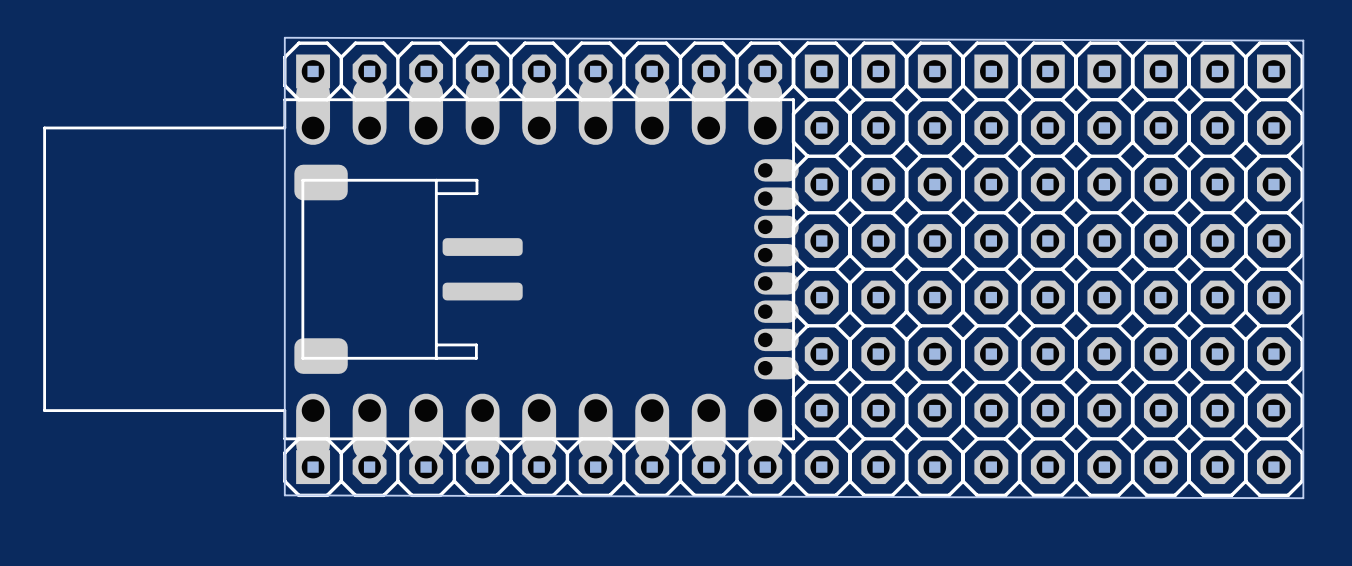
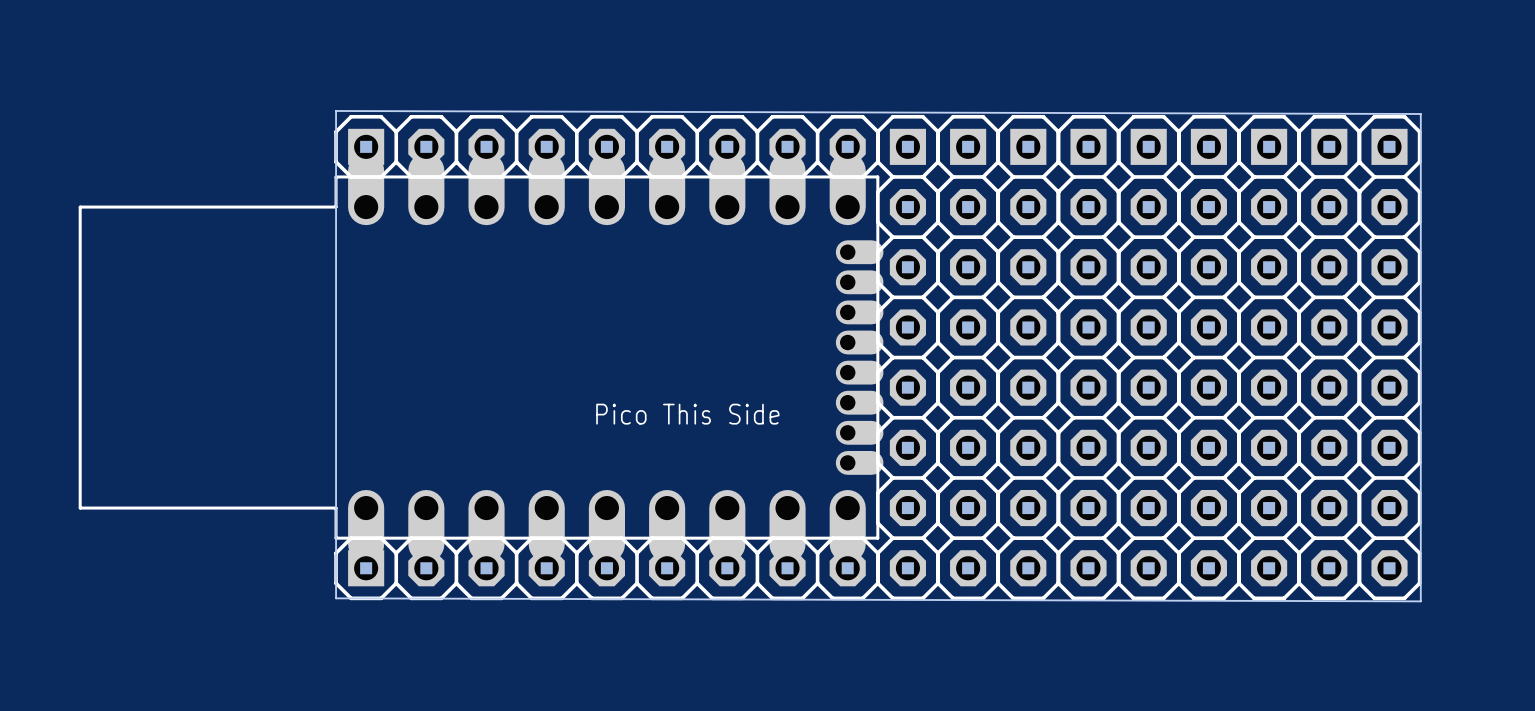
part: (408, 269) -> none
text: none -> Pico This Side (687, 414)

